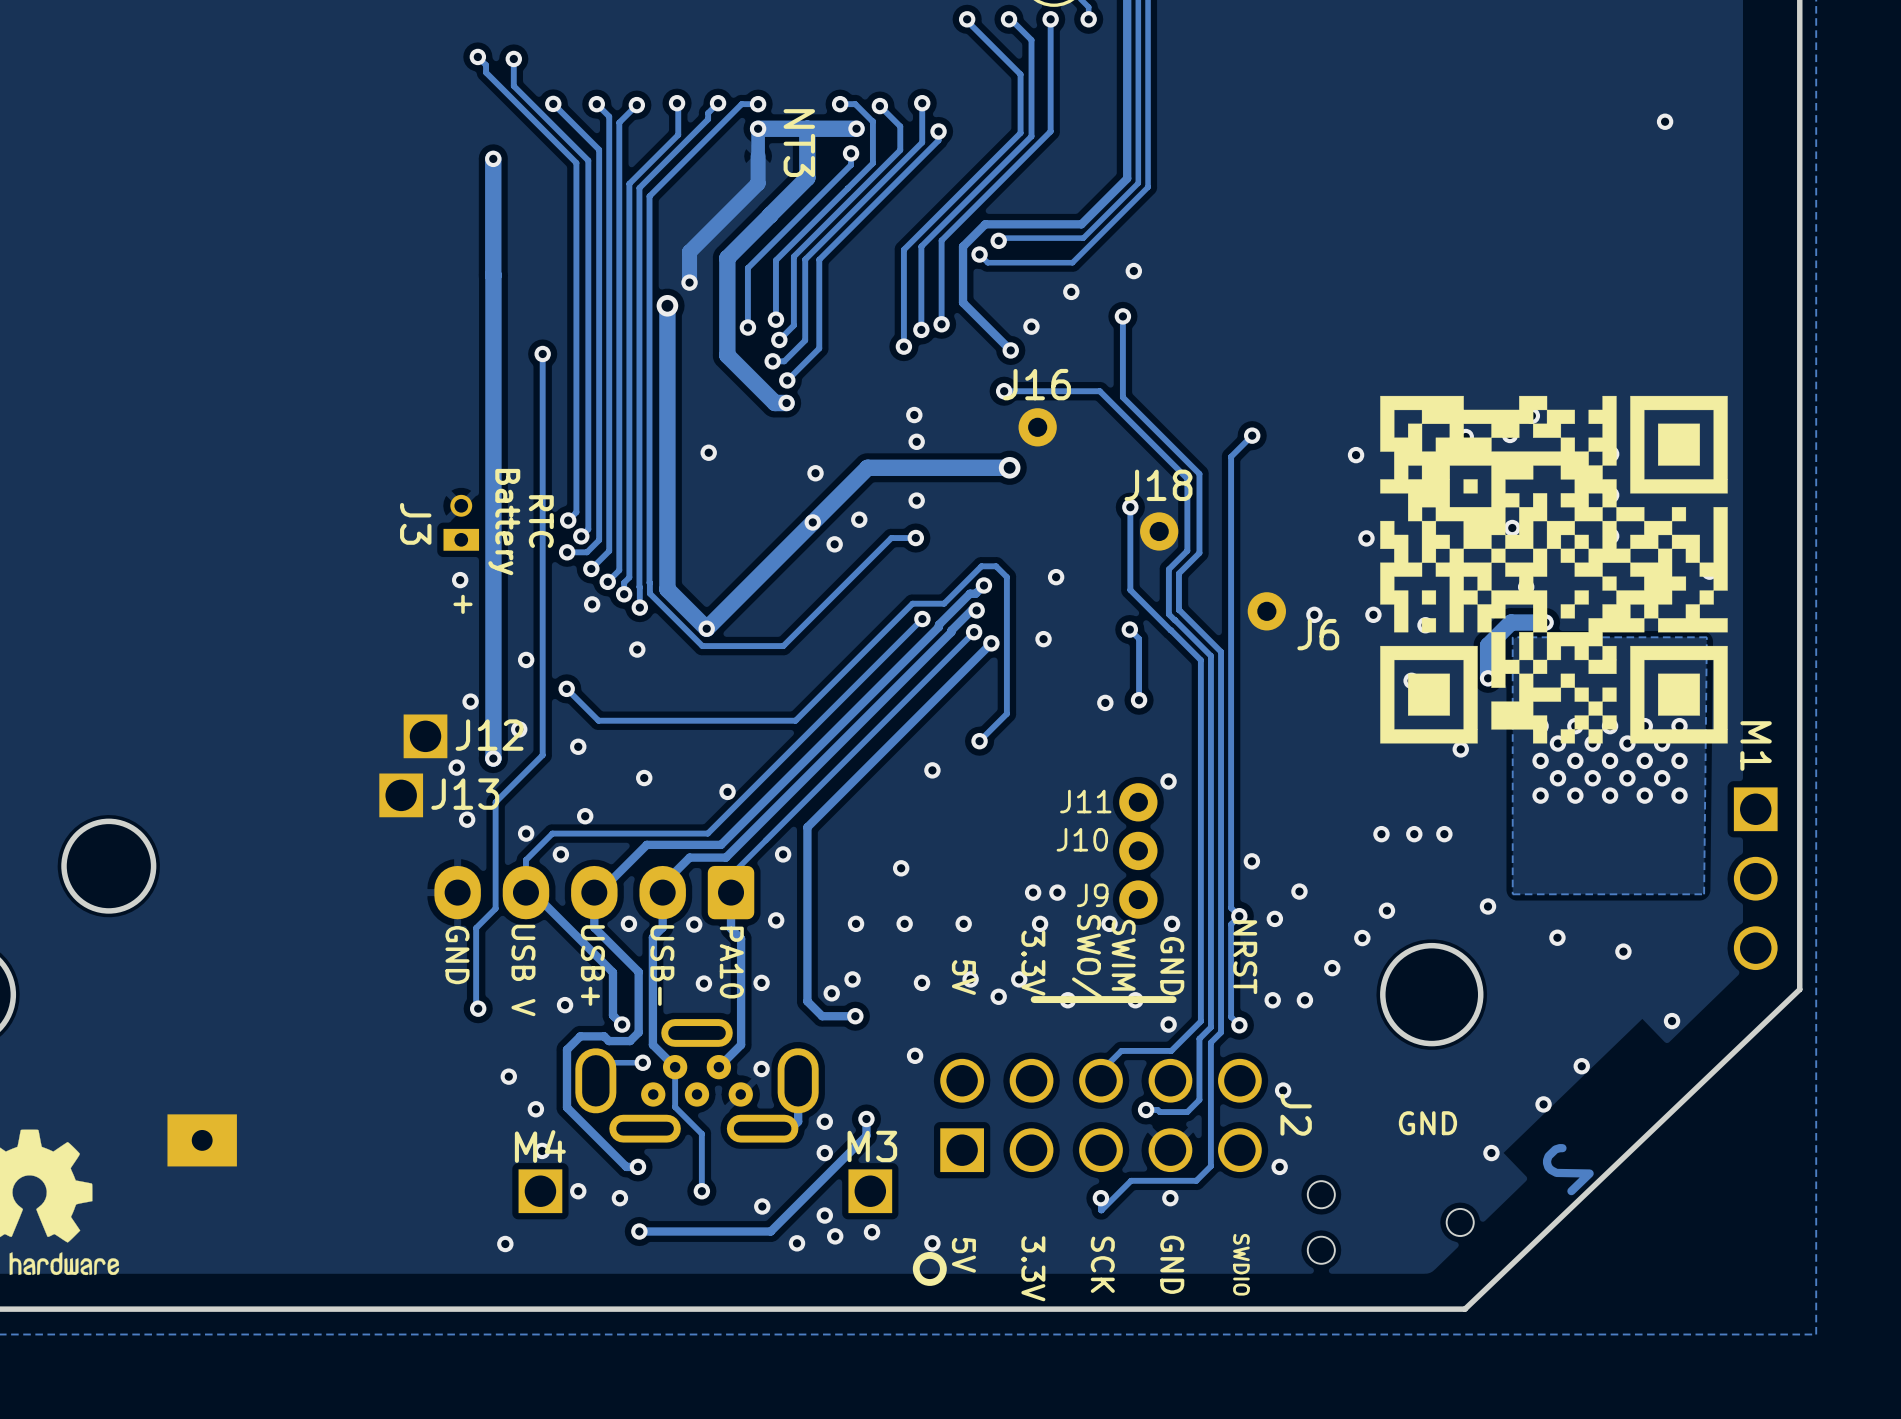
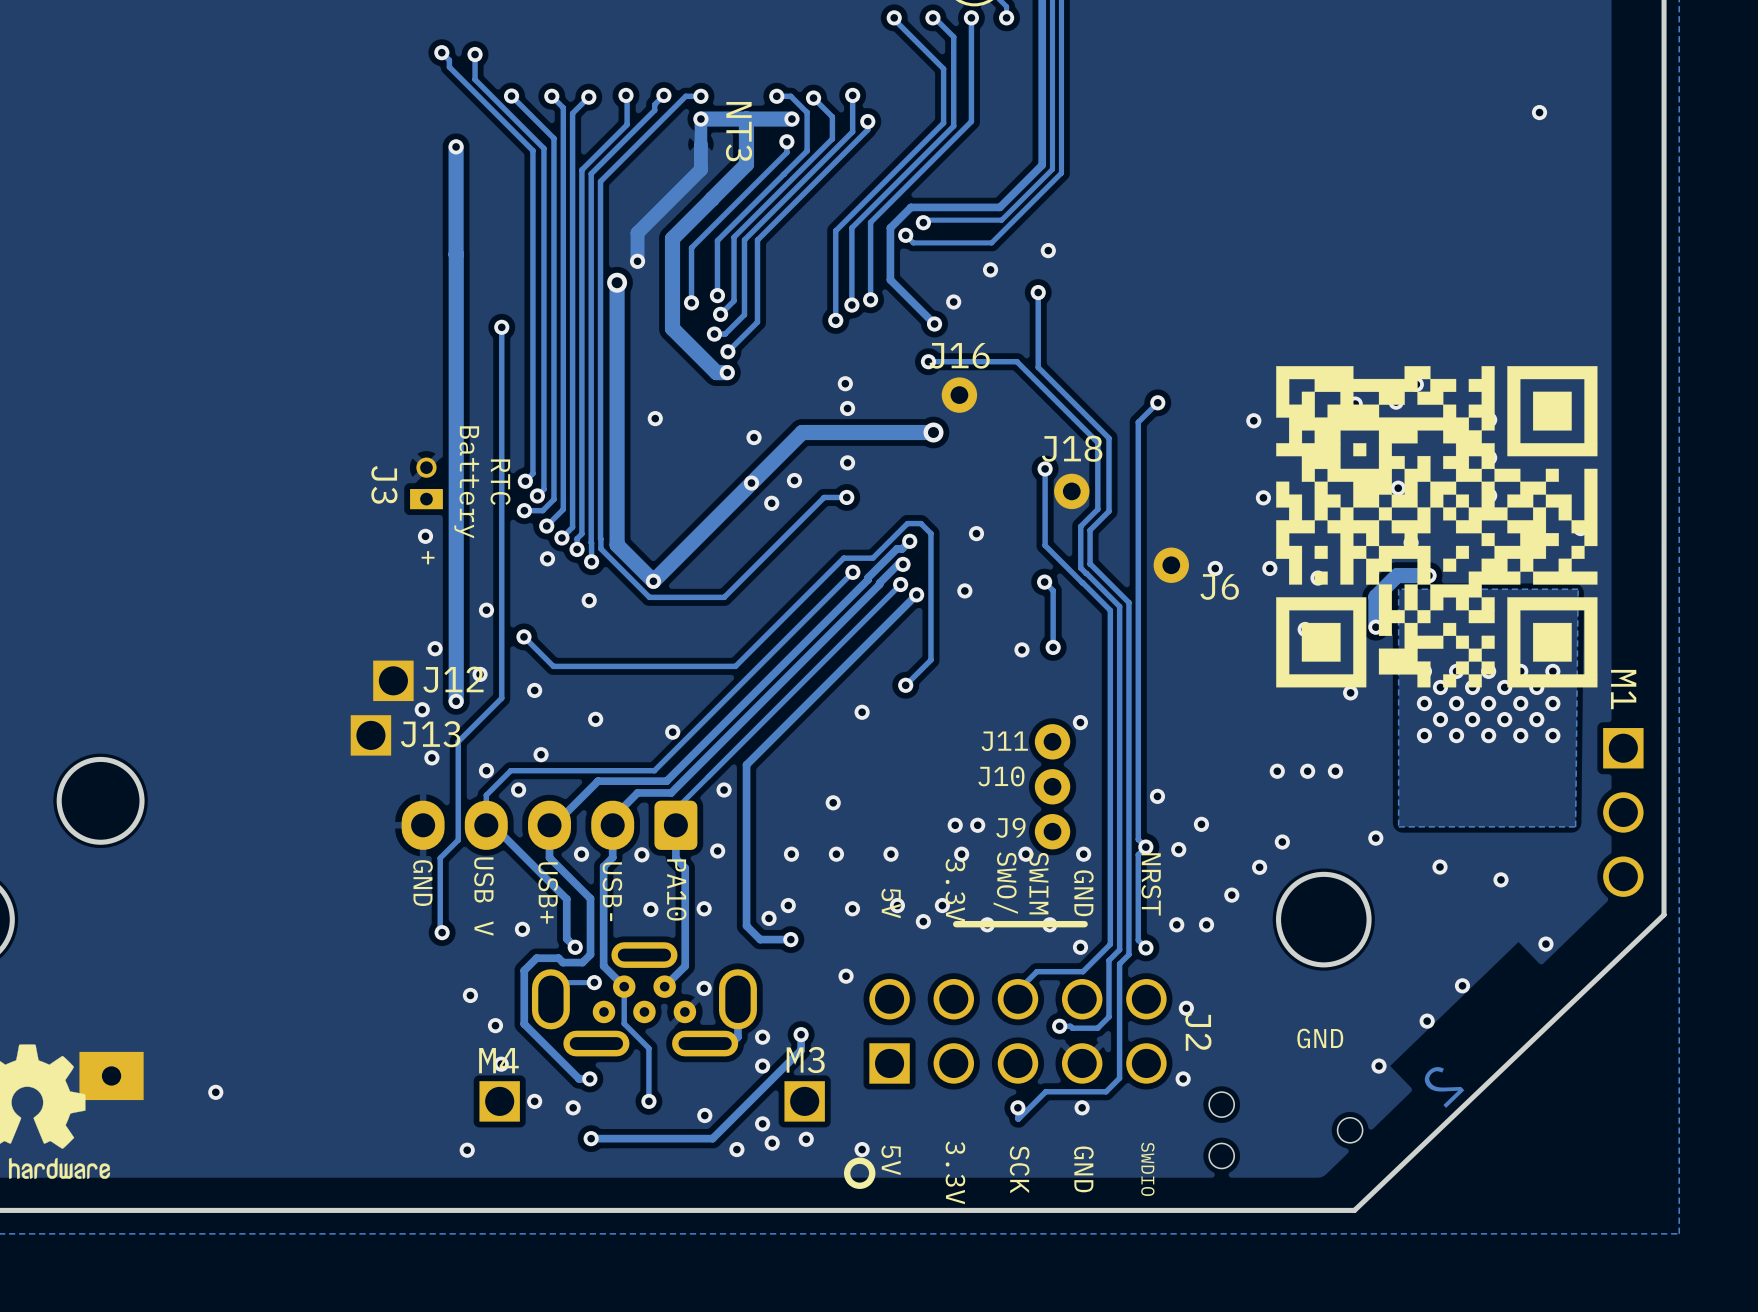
part position: (202, 1140) -> (111, 1075)
via: none -> (215, 1092)

